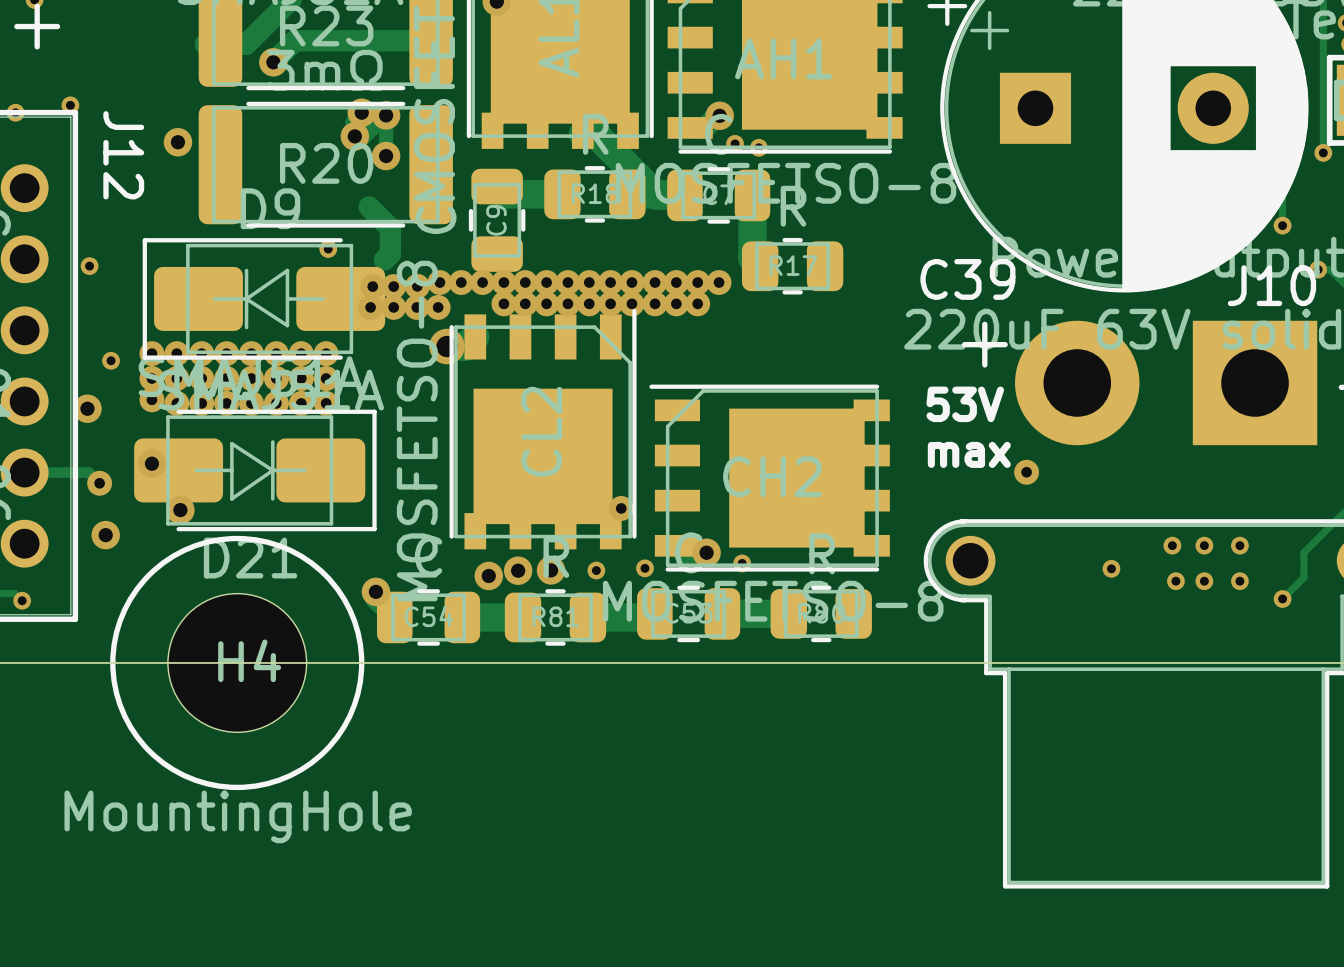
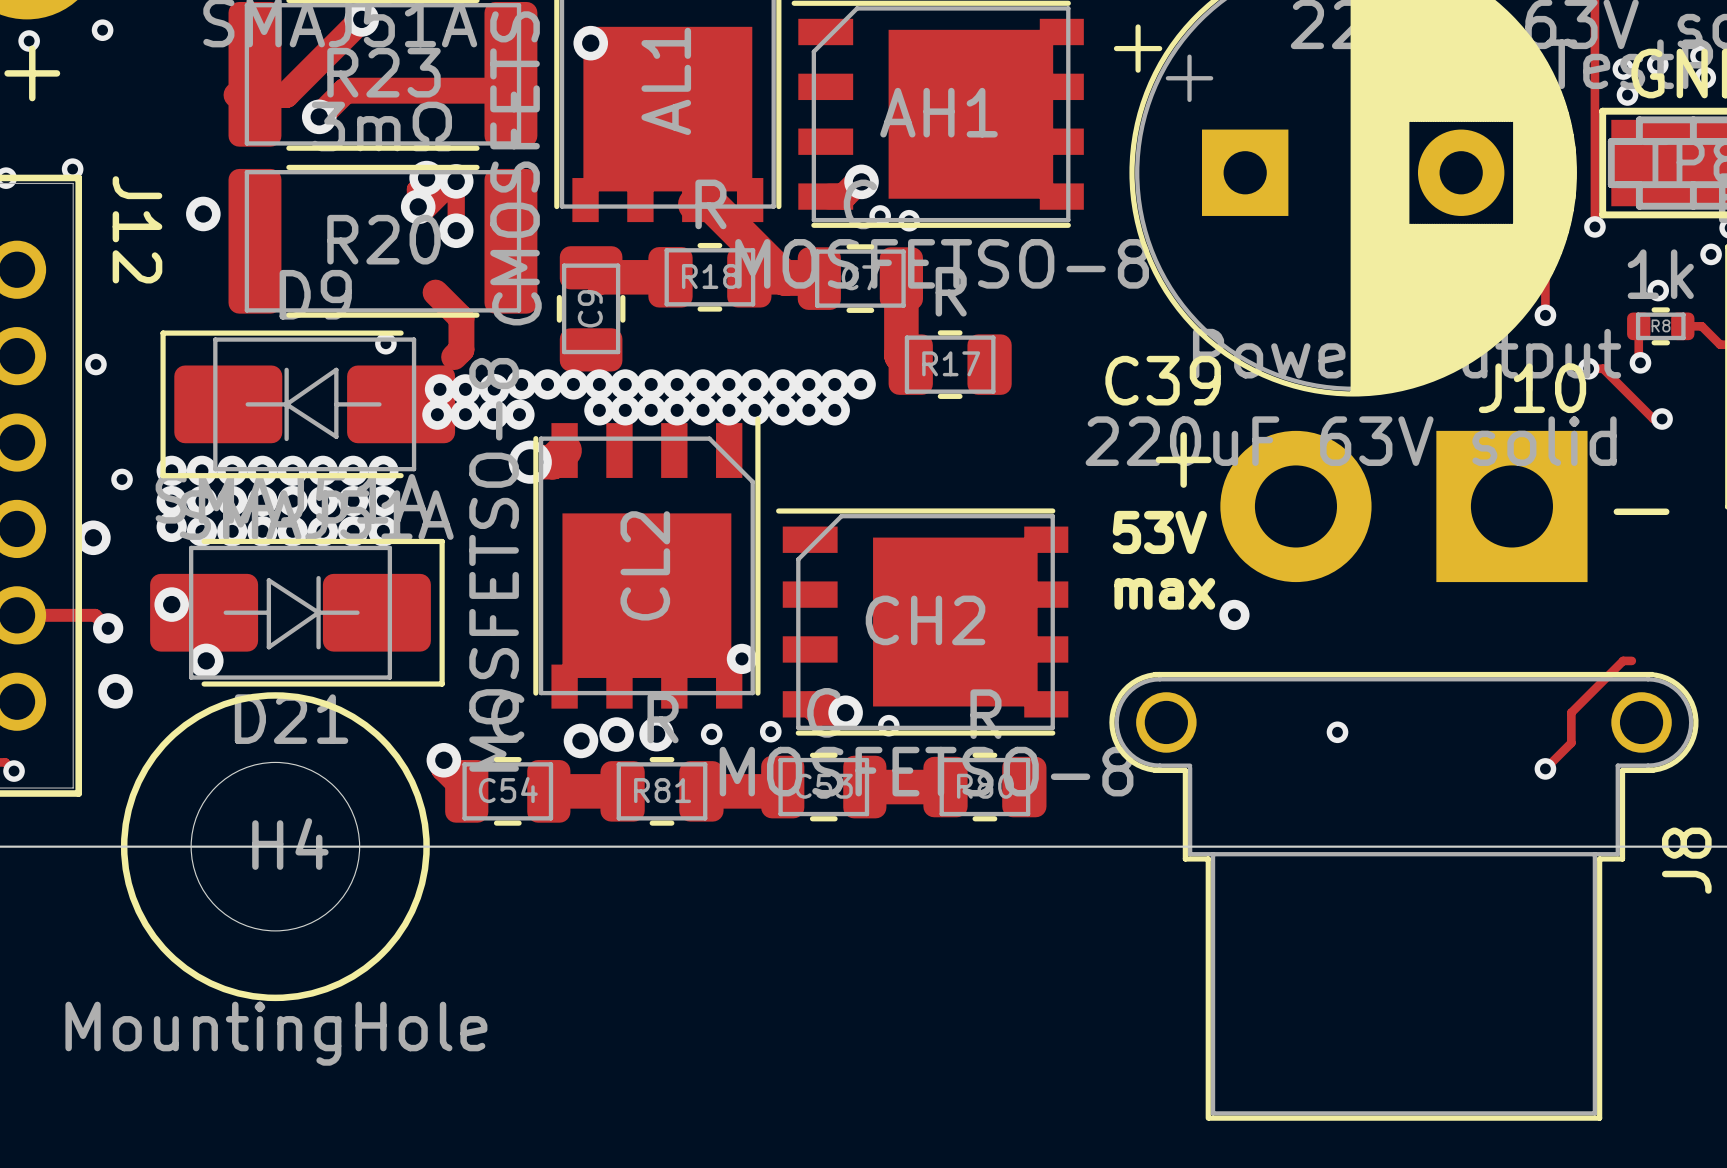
via: (1172, 545) -> none
via: (1204, 545) -> none
via: (1239, 545) -> none
via: (1175, 581) -> none
via: (1204, 581) -> none
via: (1239, 581) -> none

